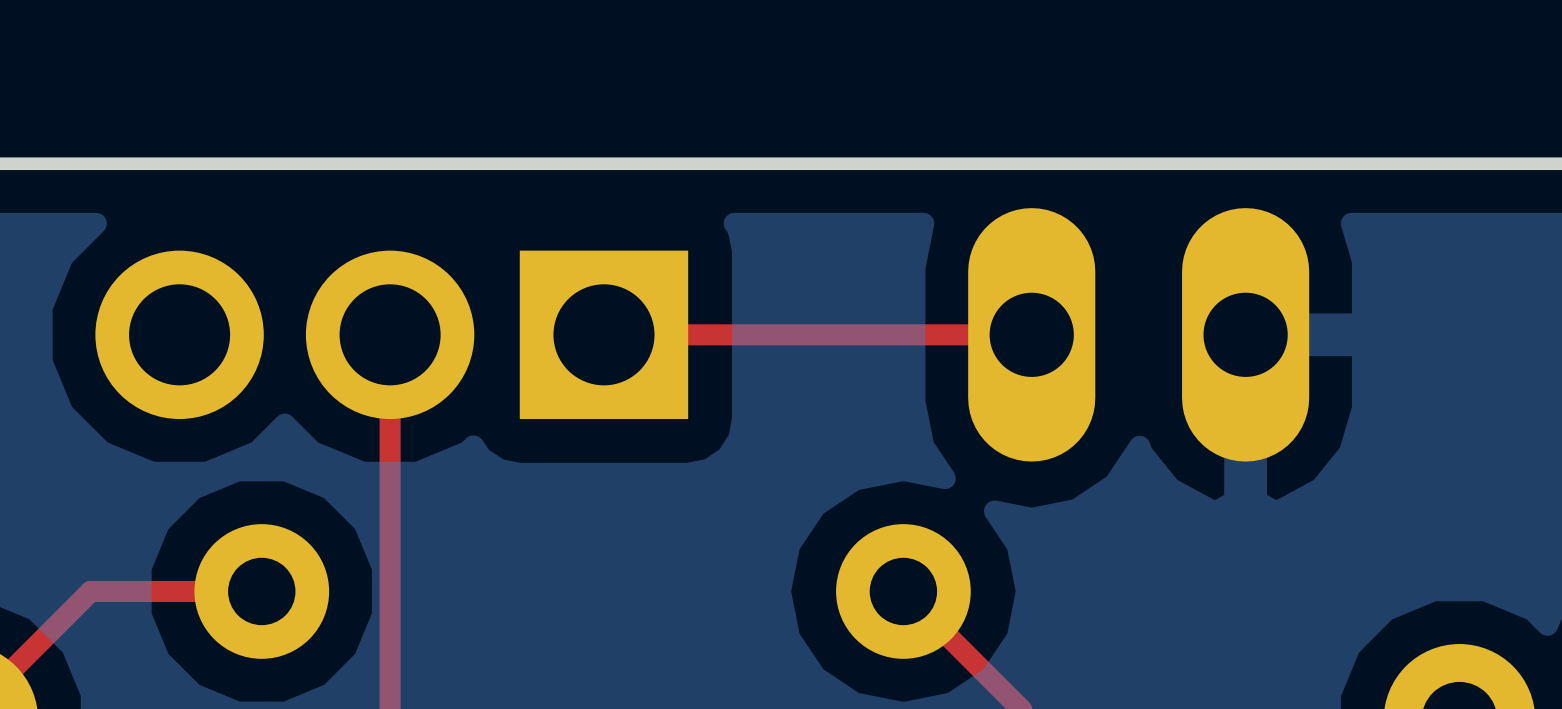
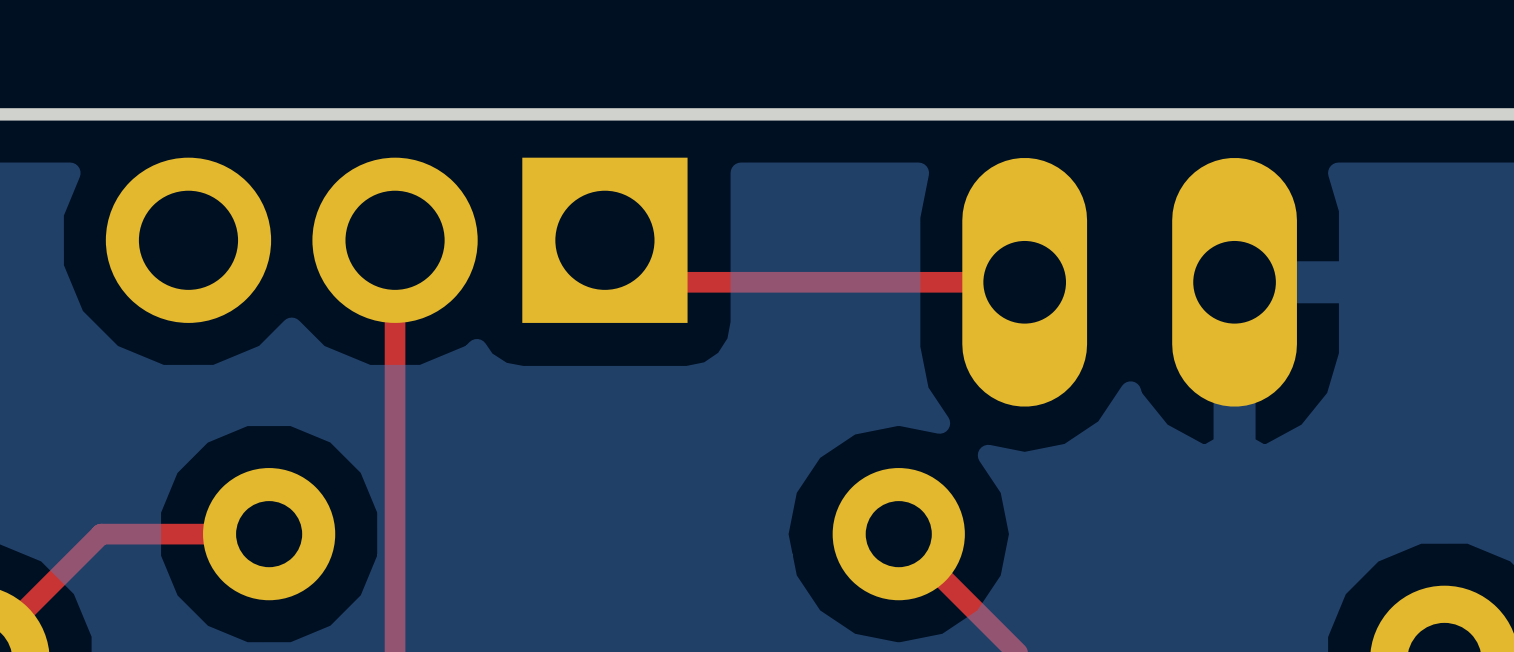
part position: (391, 334) -> (396, 240)

